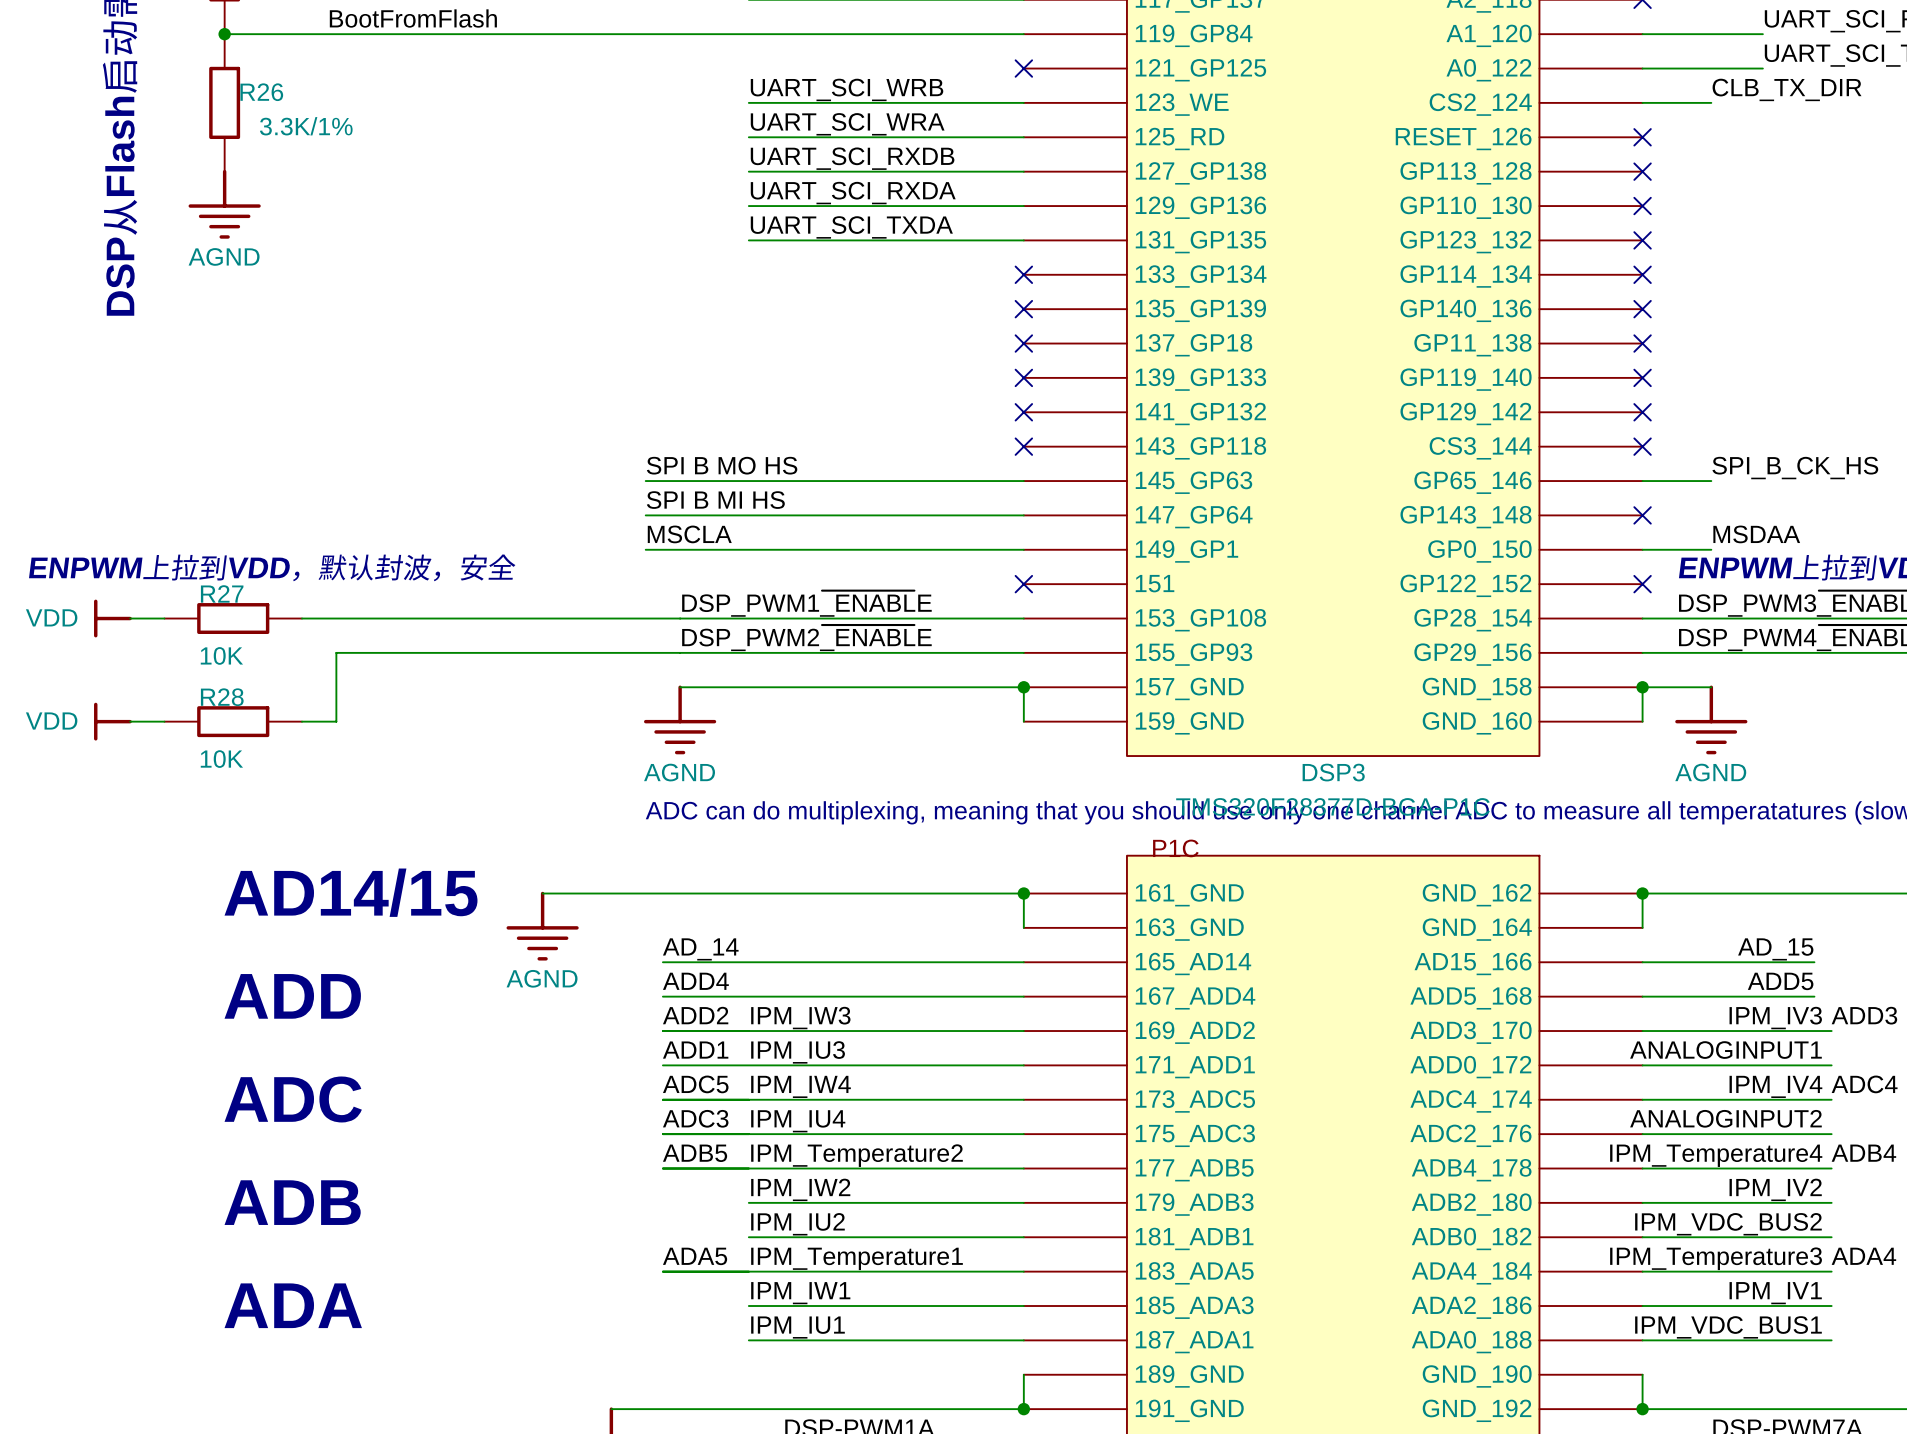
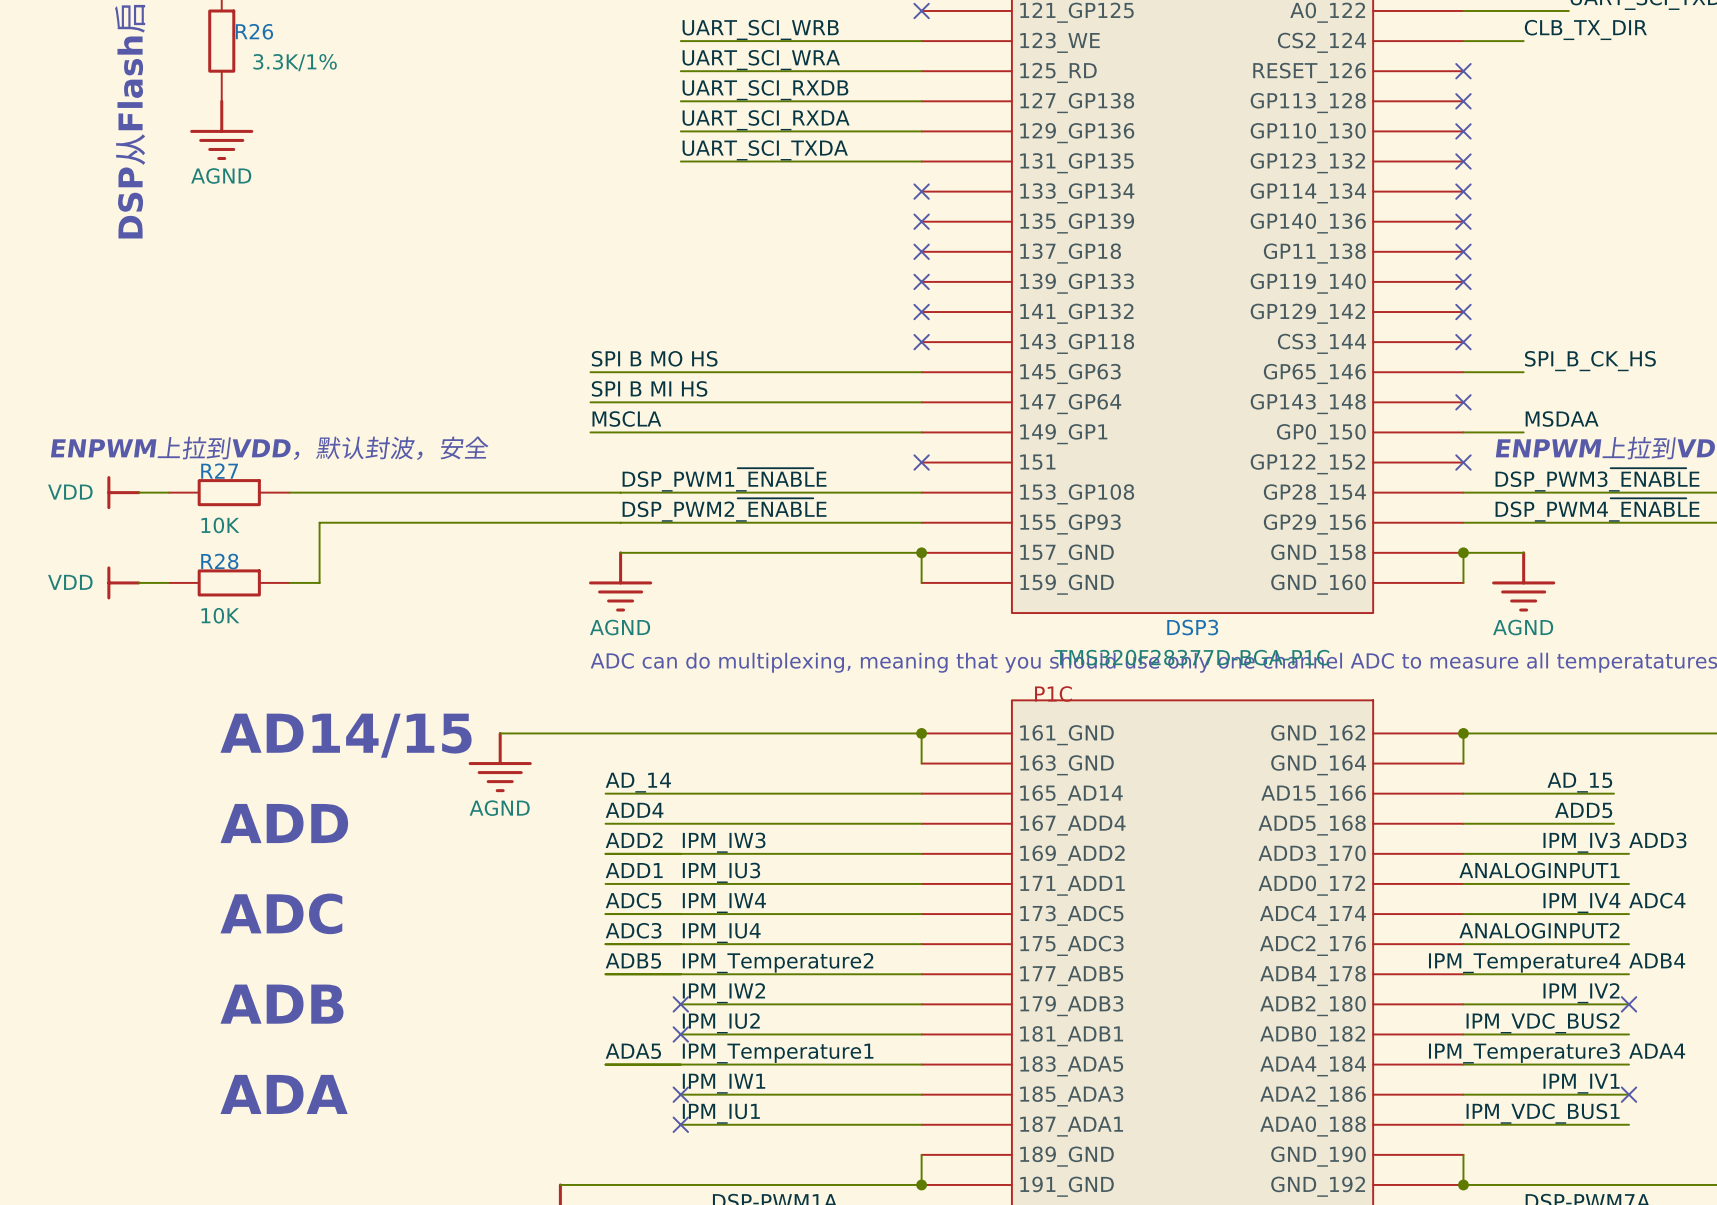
no-connect mark: none -> (680, 1004)
no-connect mark: none -> (1629, 1004)
no-connect mark: none -> (680, 1034)
no-connect mark: none -> (680, 1094)
no-connect mark: none -> (1629, 1094)
no-connect mark: none -> (680, 1124)

